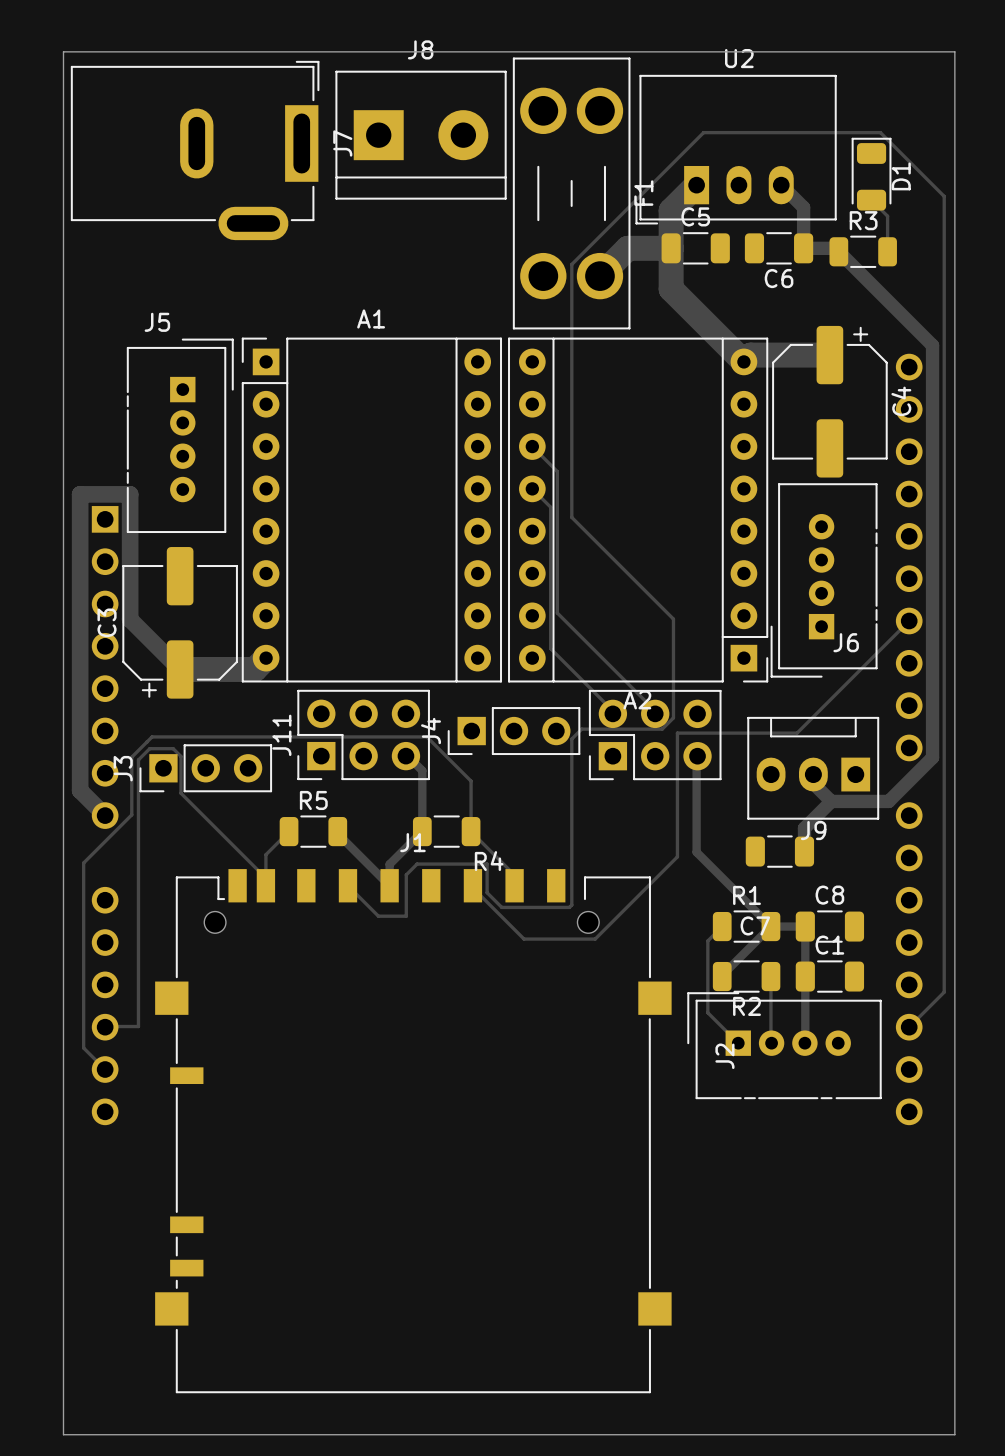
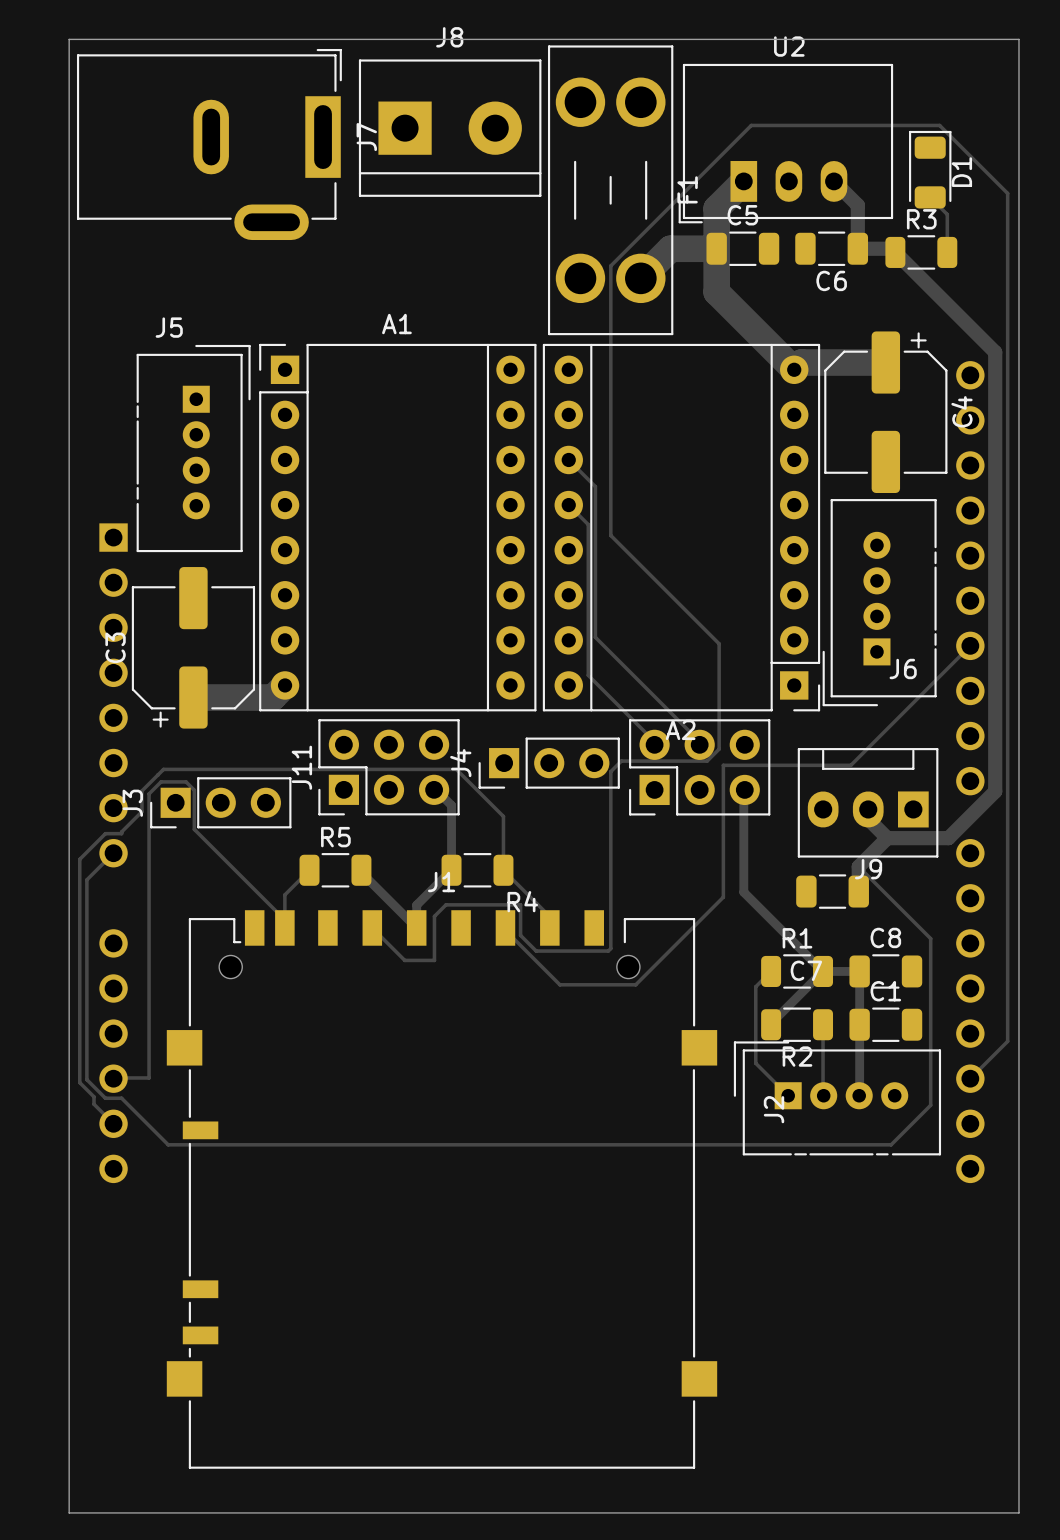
track: (180, 669) (130, 619) (130, 494) (80, 494) (80, 790) (105, 815) -> (858, 866) (930, 938) (930, 1105) (891, 1144) (168, 1144) (121, 1098) (105, 1098) (86, 1079) (86, 879) (113, 853)
track: (131, 776) (131, 814) (83, 863) (83, 1048) (86, 1051) -> (141, 811) (121, 833) (105, 833) (79, 859) (79, 1082) (94, 1096) (94, 1104)

